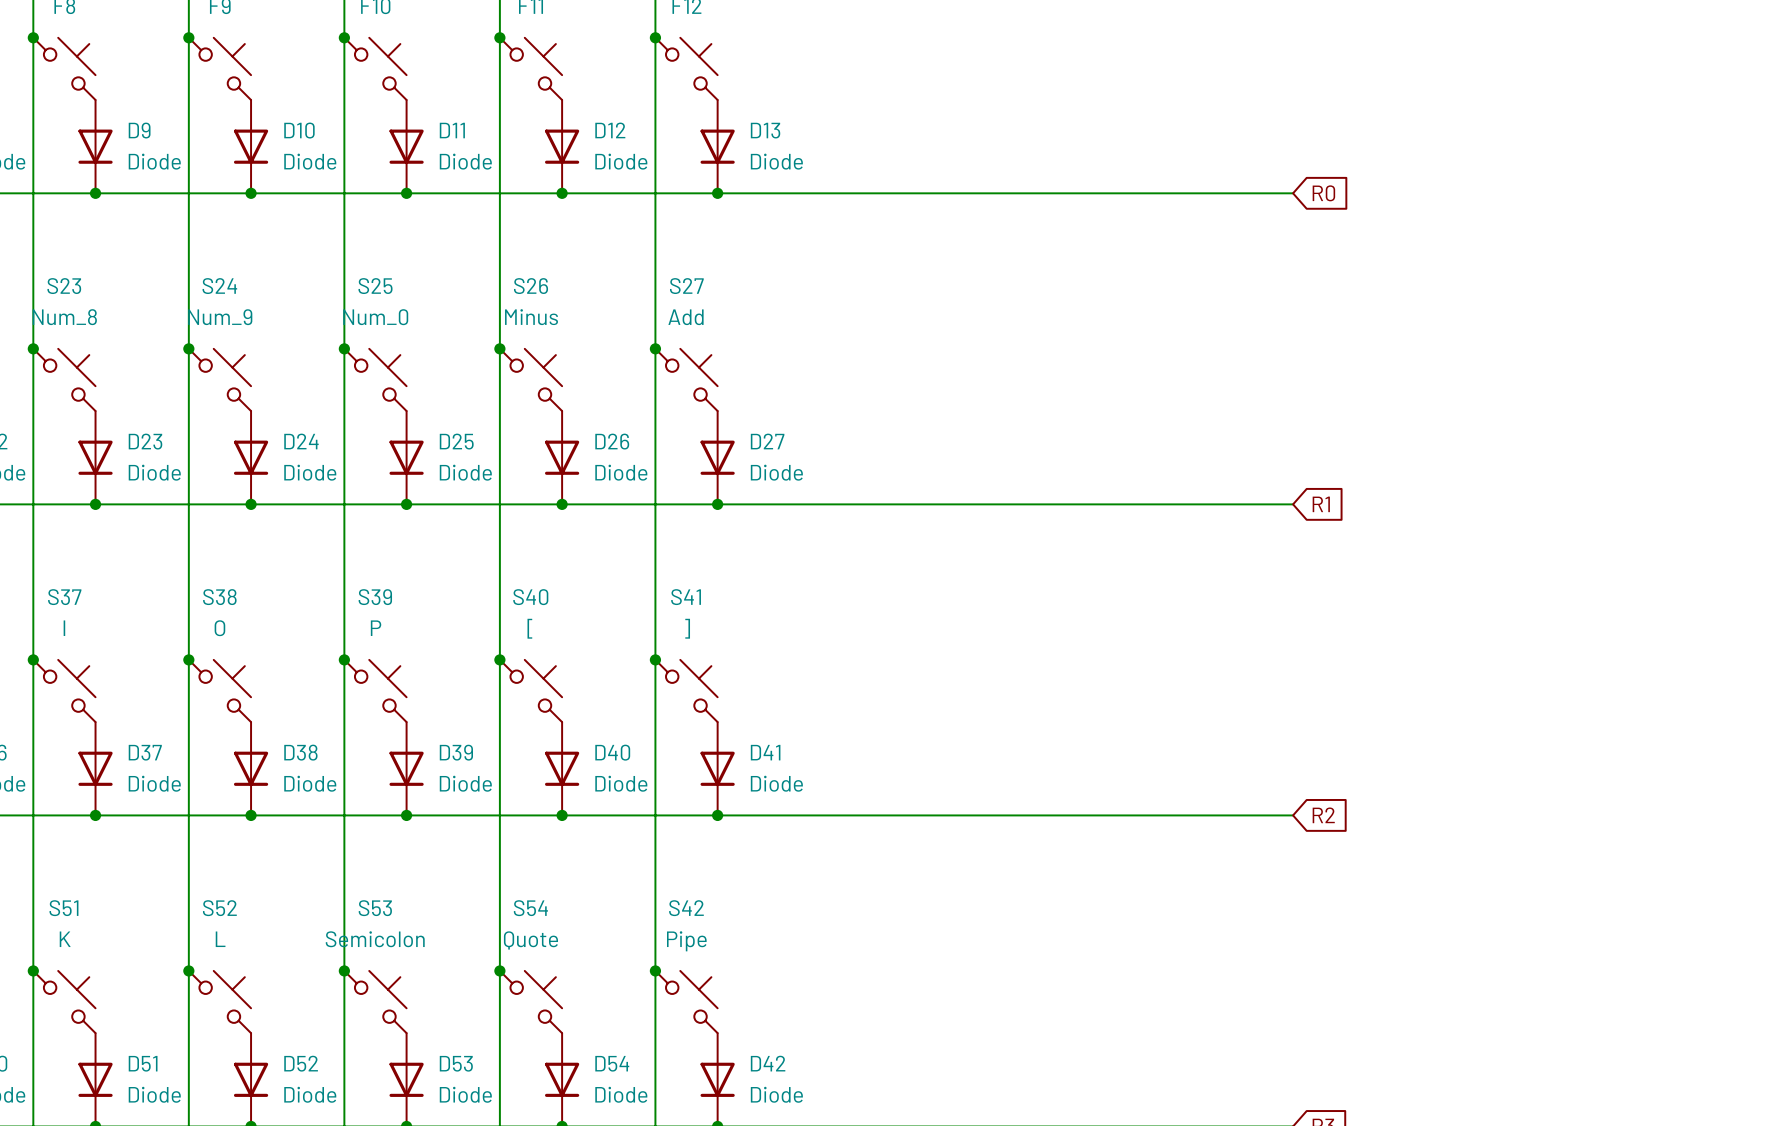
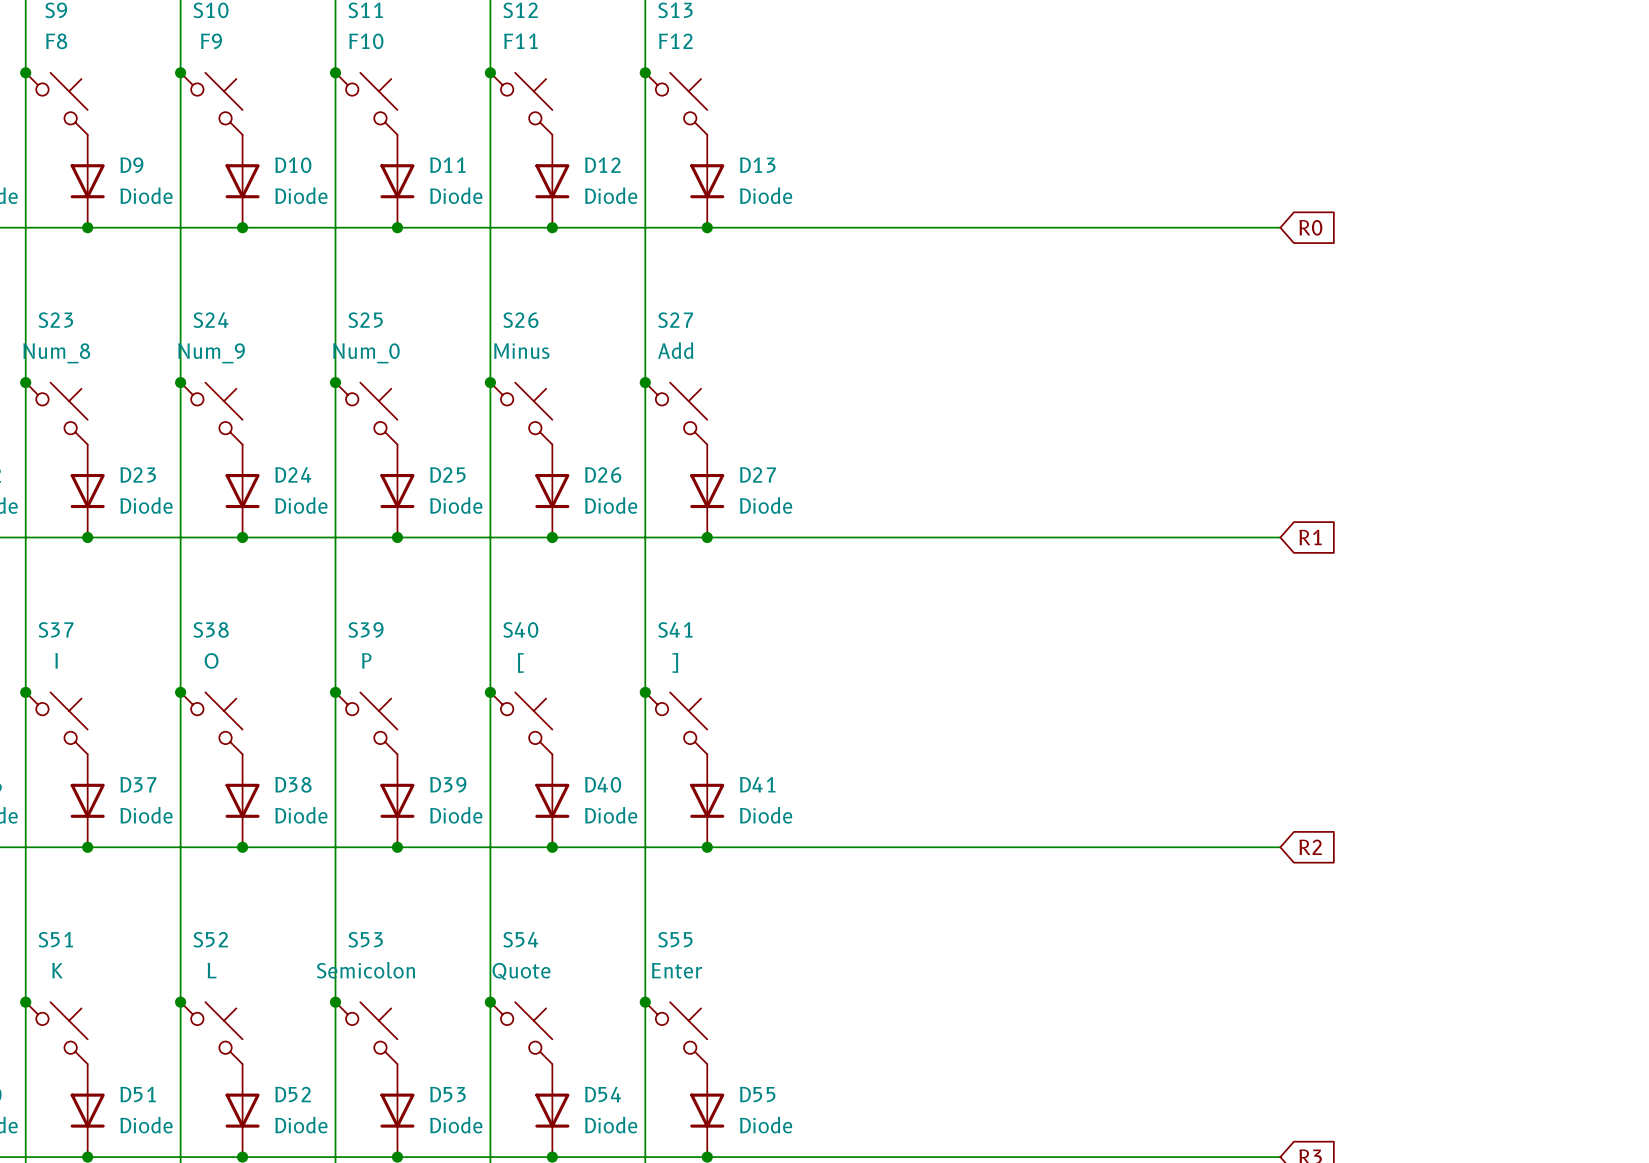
S42 name: S42 (686, 908) -> S55 (675, 939)
S42 value: Pipe (686, 941) -> Enter (677, 970)
D42 name: D42 (768, 1063) -> D55 (757, 1094)

